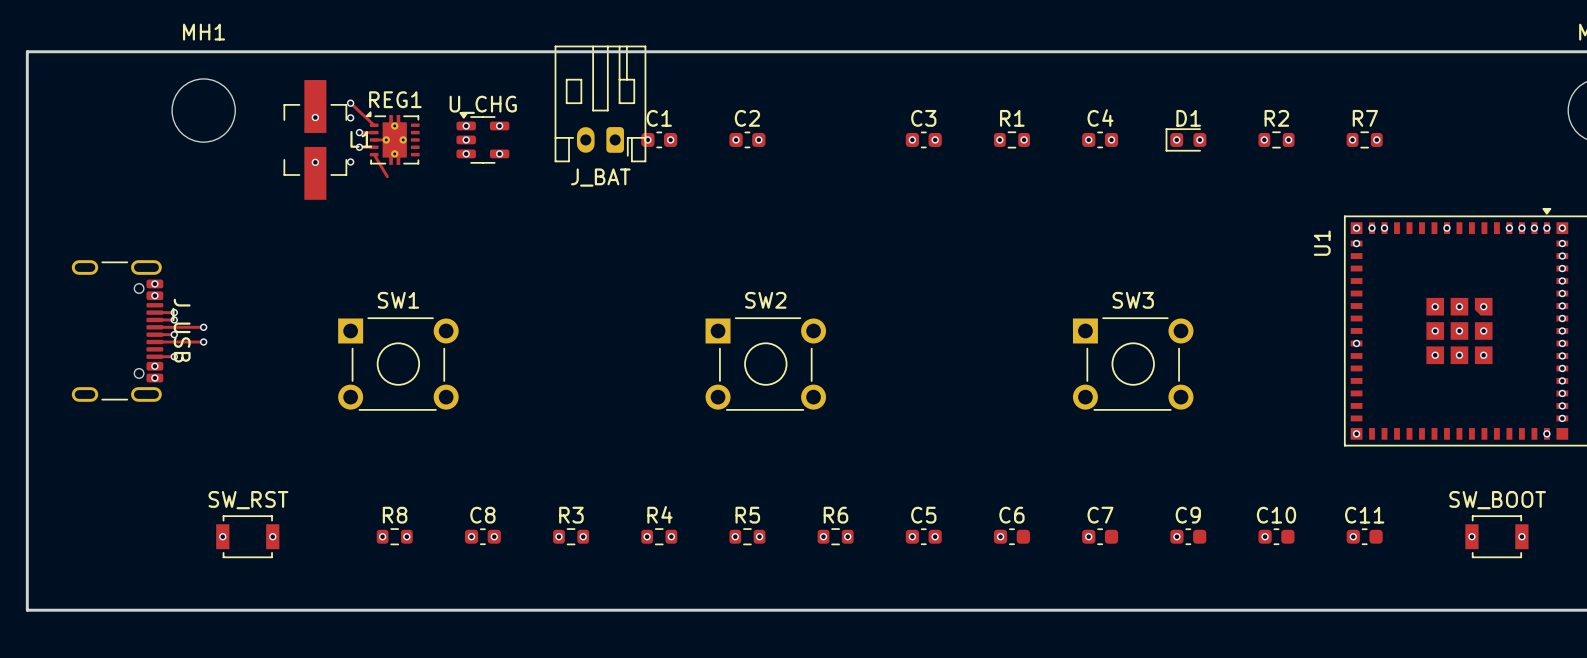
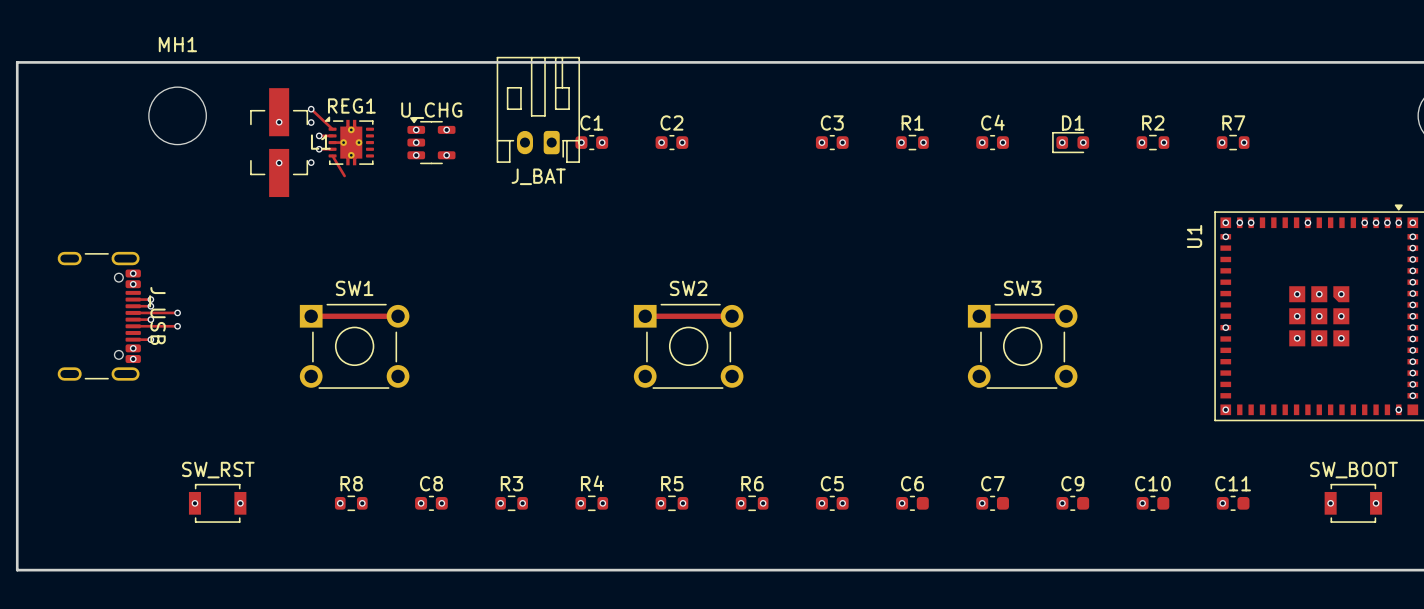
track: none -> (311, 316) (398, 316)
track: none -> (645, 316) (732, 316)
track: none -> (979, 316) (1066, 316)

